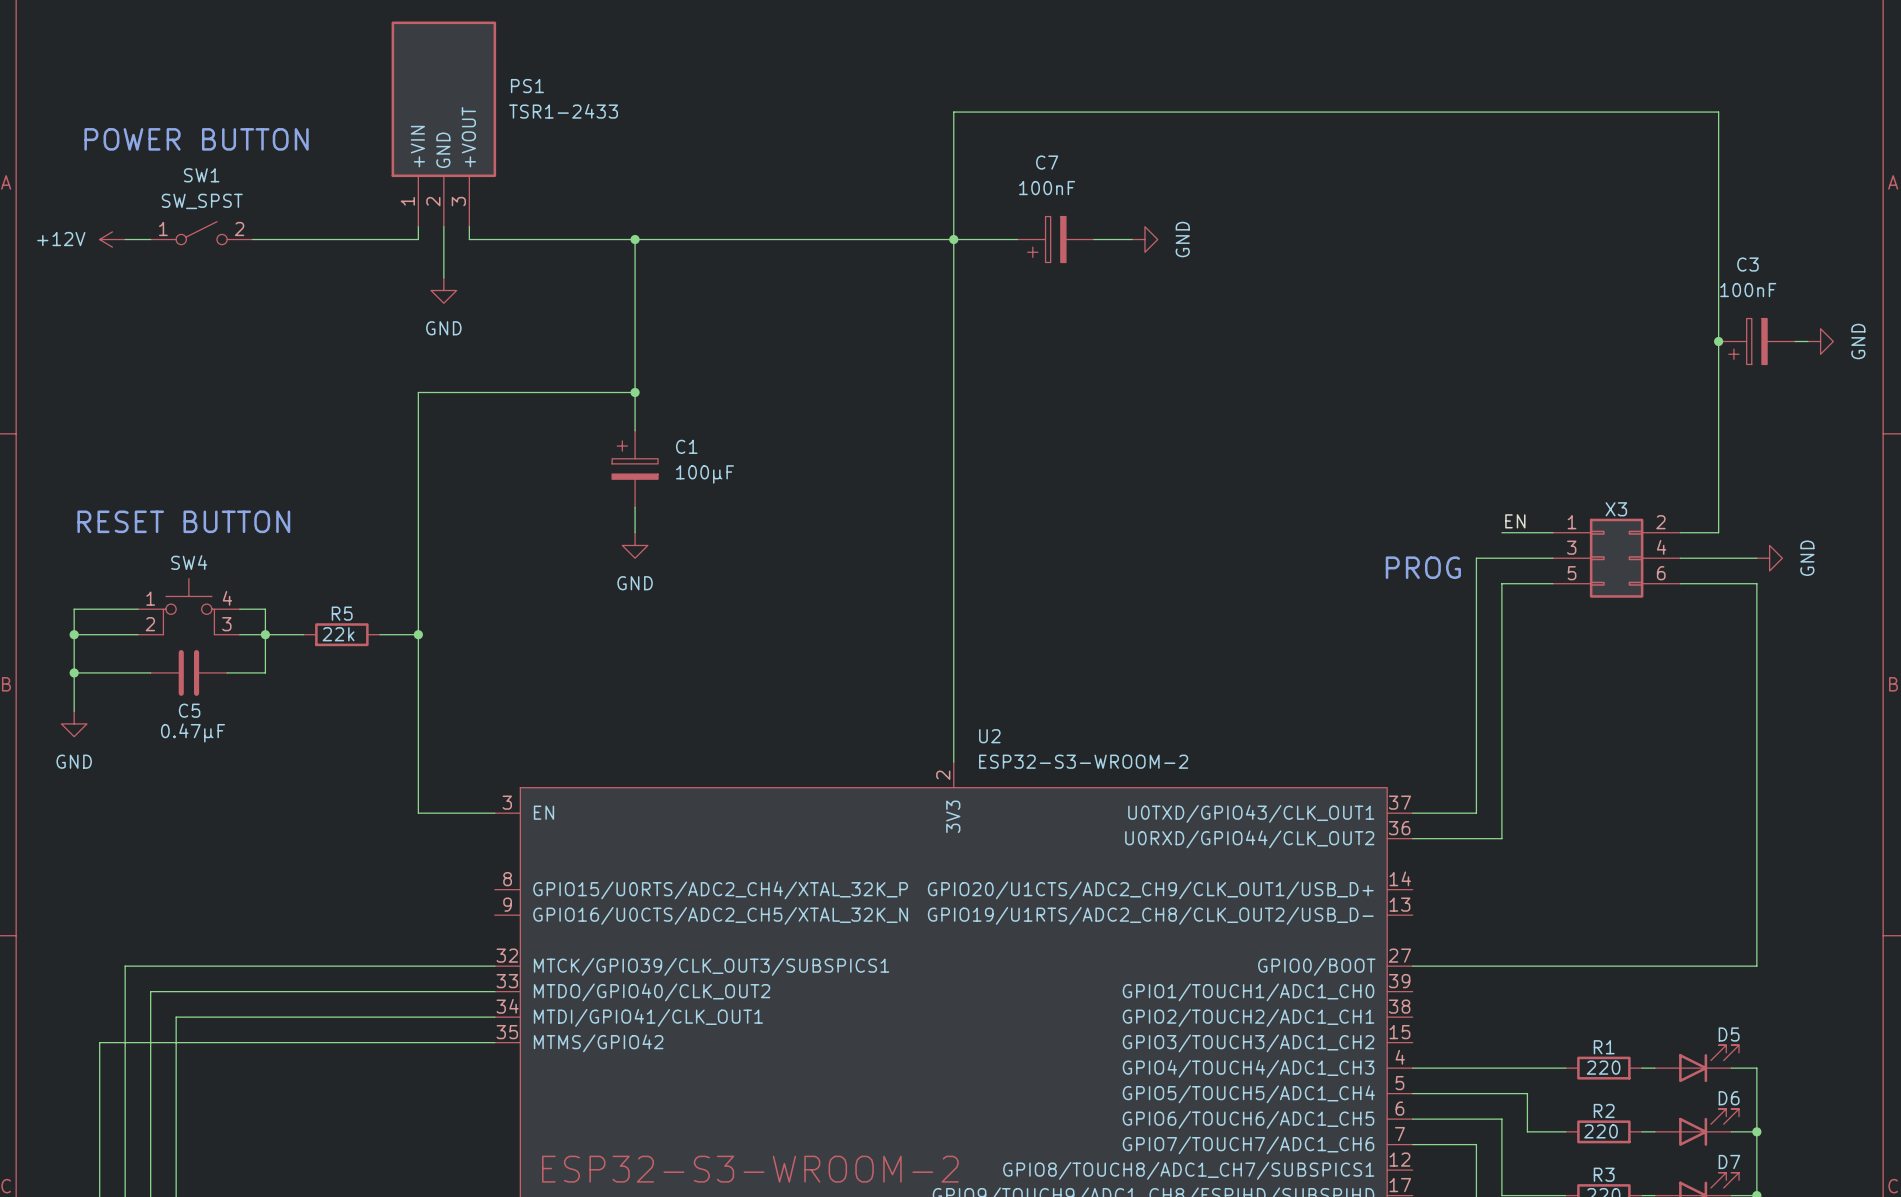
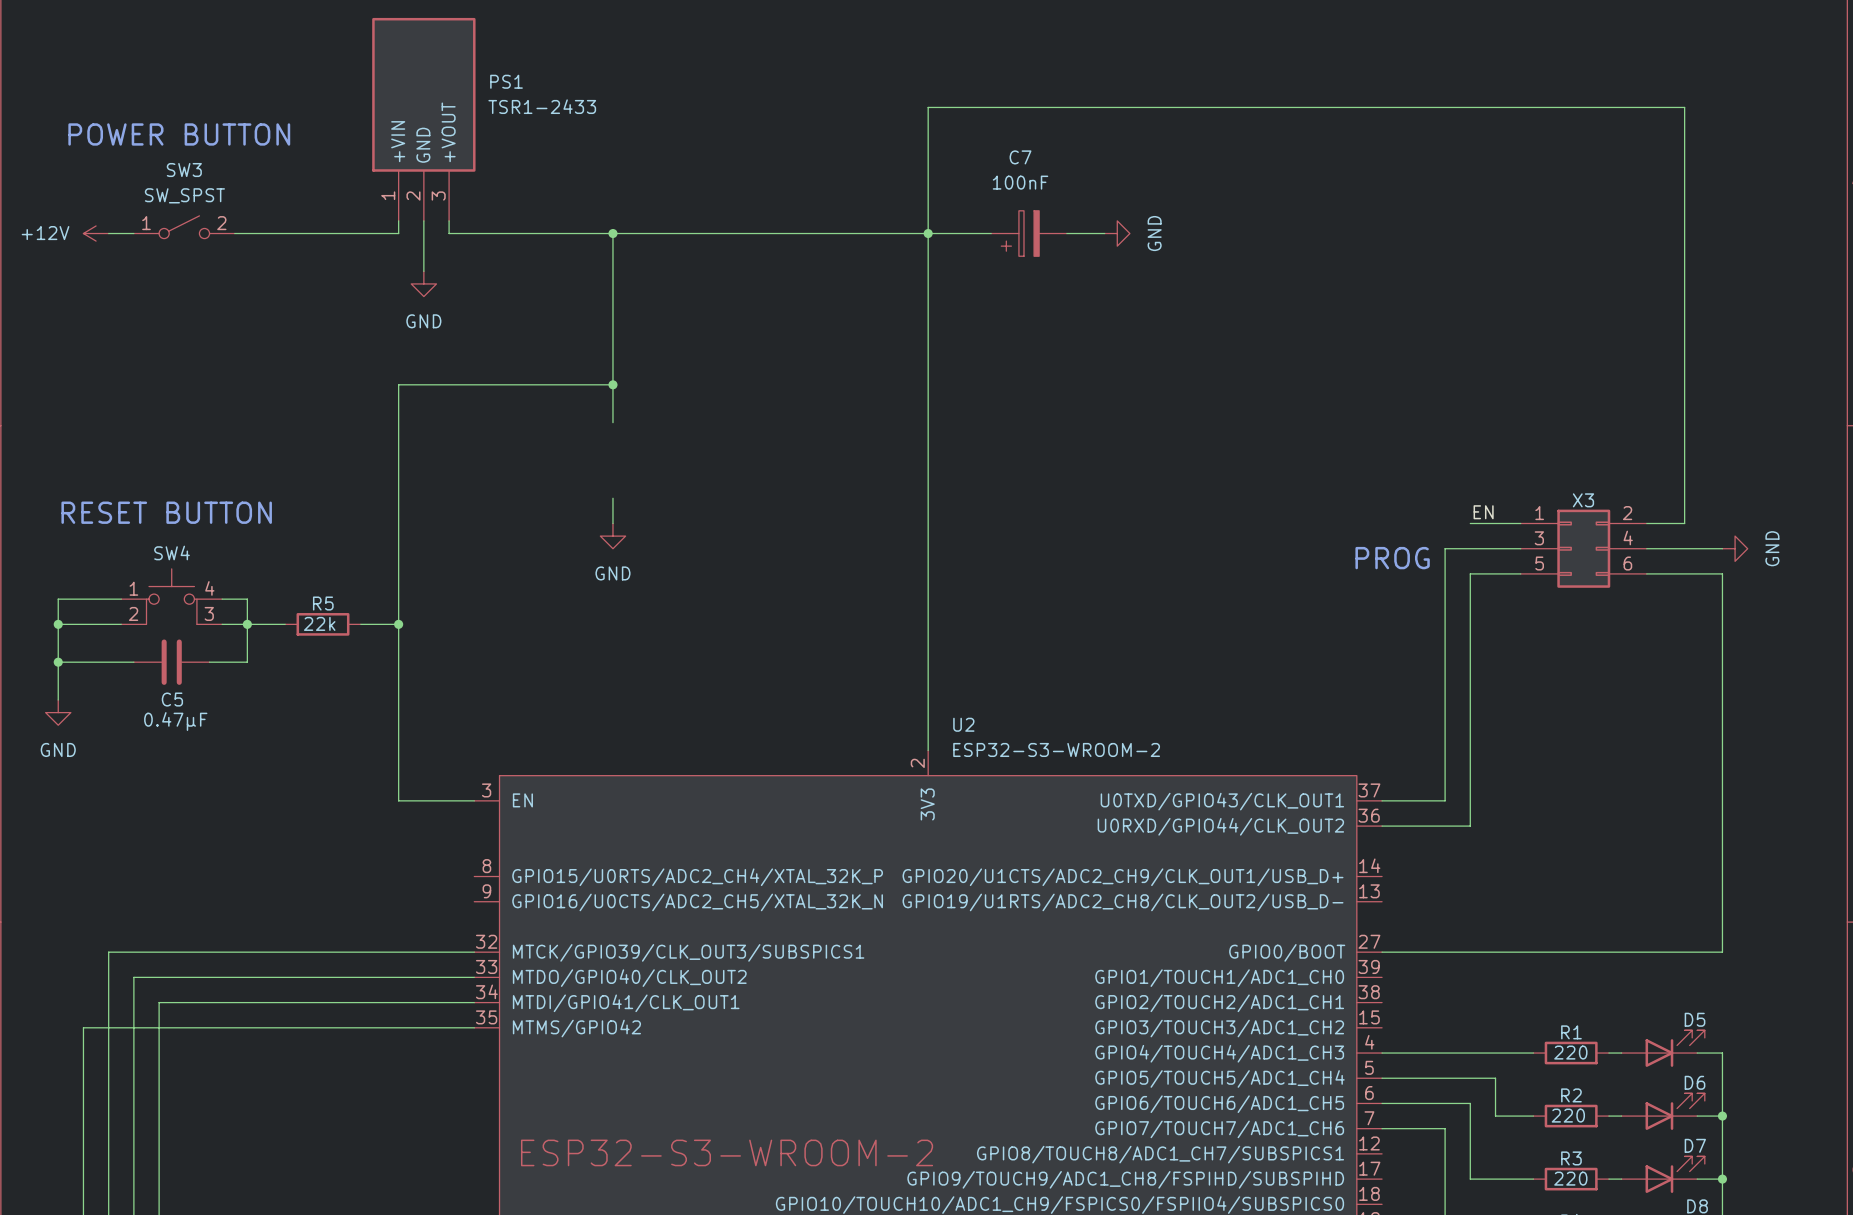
SW1 name: SW1 (201, 175) -> SW3 (184, 170)
junction: (1718, 341) -> none
C3: 100nF (1756, 341) -> none
wire: (1795, 341) (1807, 341) -> none
power symbol: GND (1820, 341) -> none
C1: 100µF (635, 468) -> none

